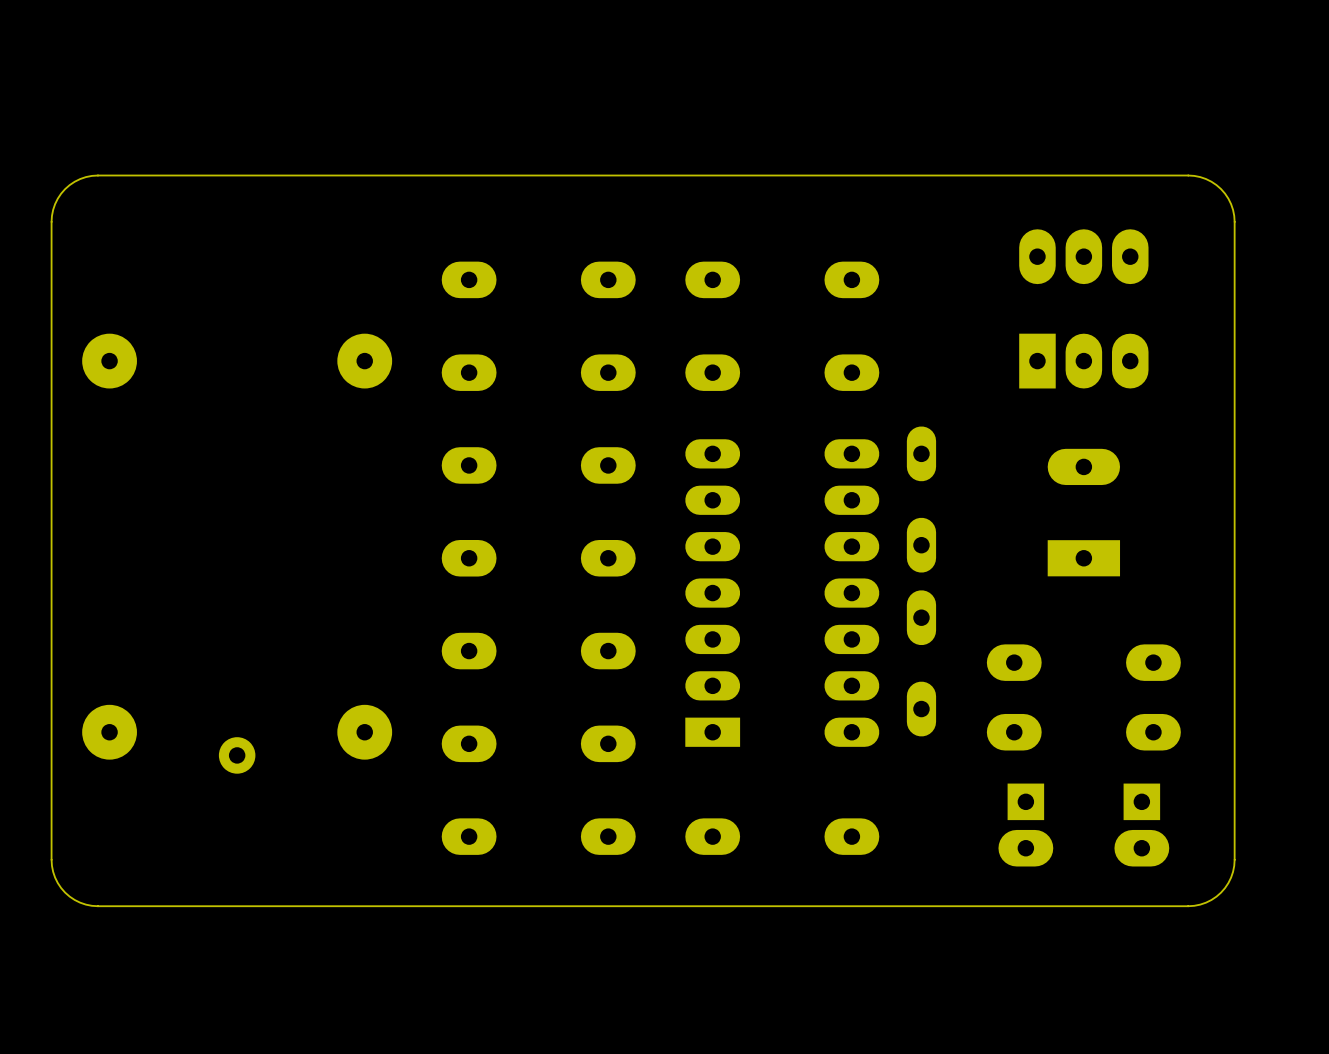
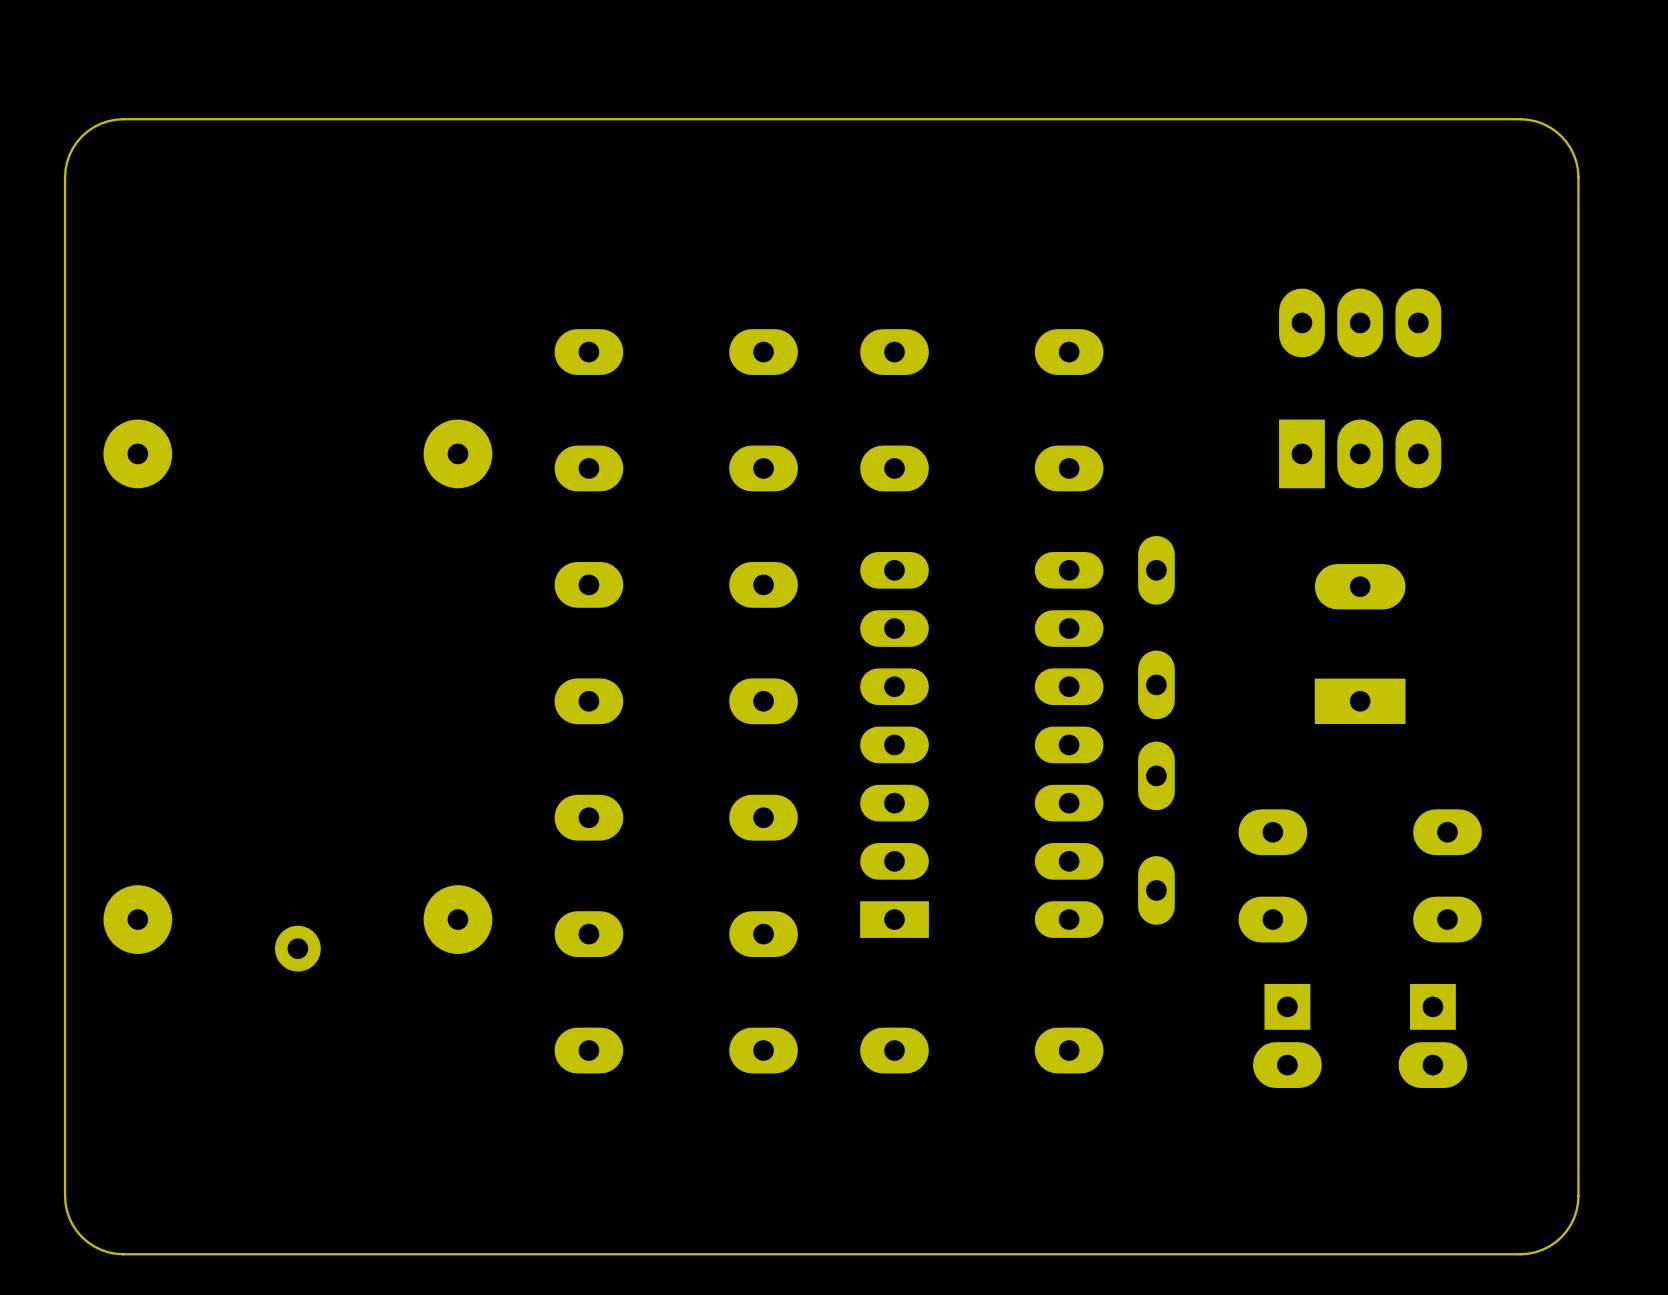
board edge: (51, 221) (55, 204) (65, 189) (80, 179) (97, 175) (1188, 175) (1200, 177) (1211, 181) (1221, 189) (1228, 198) (1233, 209) (1234, 221) (1234, 859) (1231, 877) (1221, 892) (1206, 902) (1188, 906) (97, 906) (80, 902) (65, 892) (55, 877) (51, 859) -> (65, 279) (65, 177) (67, 162) (72, 148) (82, 136) (101, 123) (115, 119) (1520, 119) (1535, 121) (1549, 127) (1561, 136) (1570, 148) (1576, 162) (1578, 177) (1577, 1203) (1574, 1218) (1561, 1237) (1542, 1249) (1520, 1254) (115, 1253) (101, 1249) (82, 1237) (72, 1225) (67, 1211) (65, 1196) (65, 1079)

